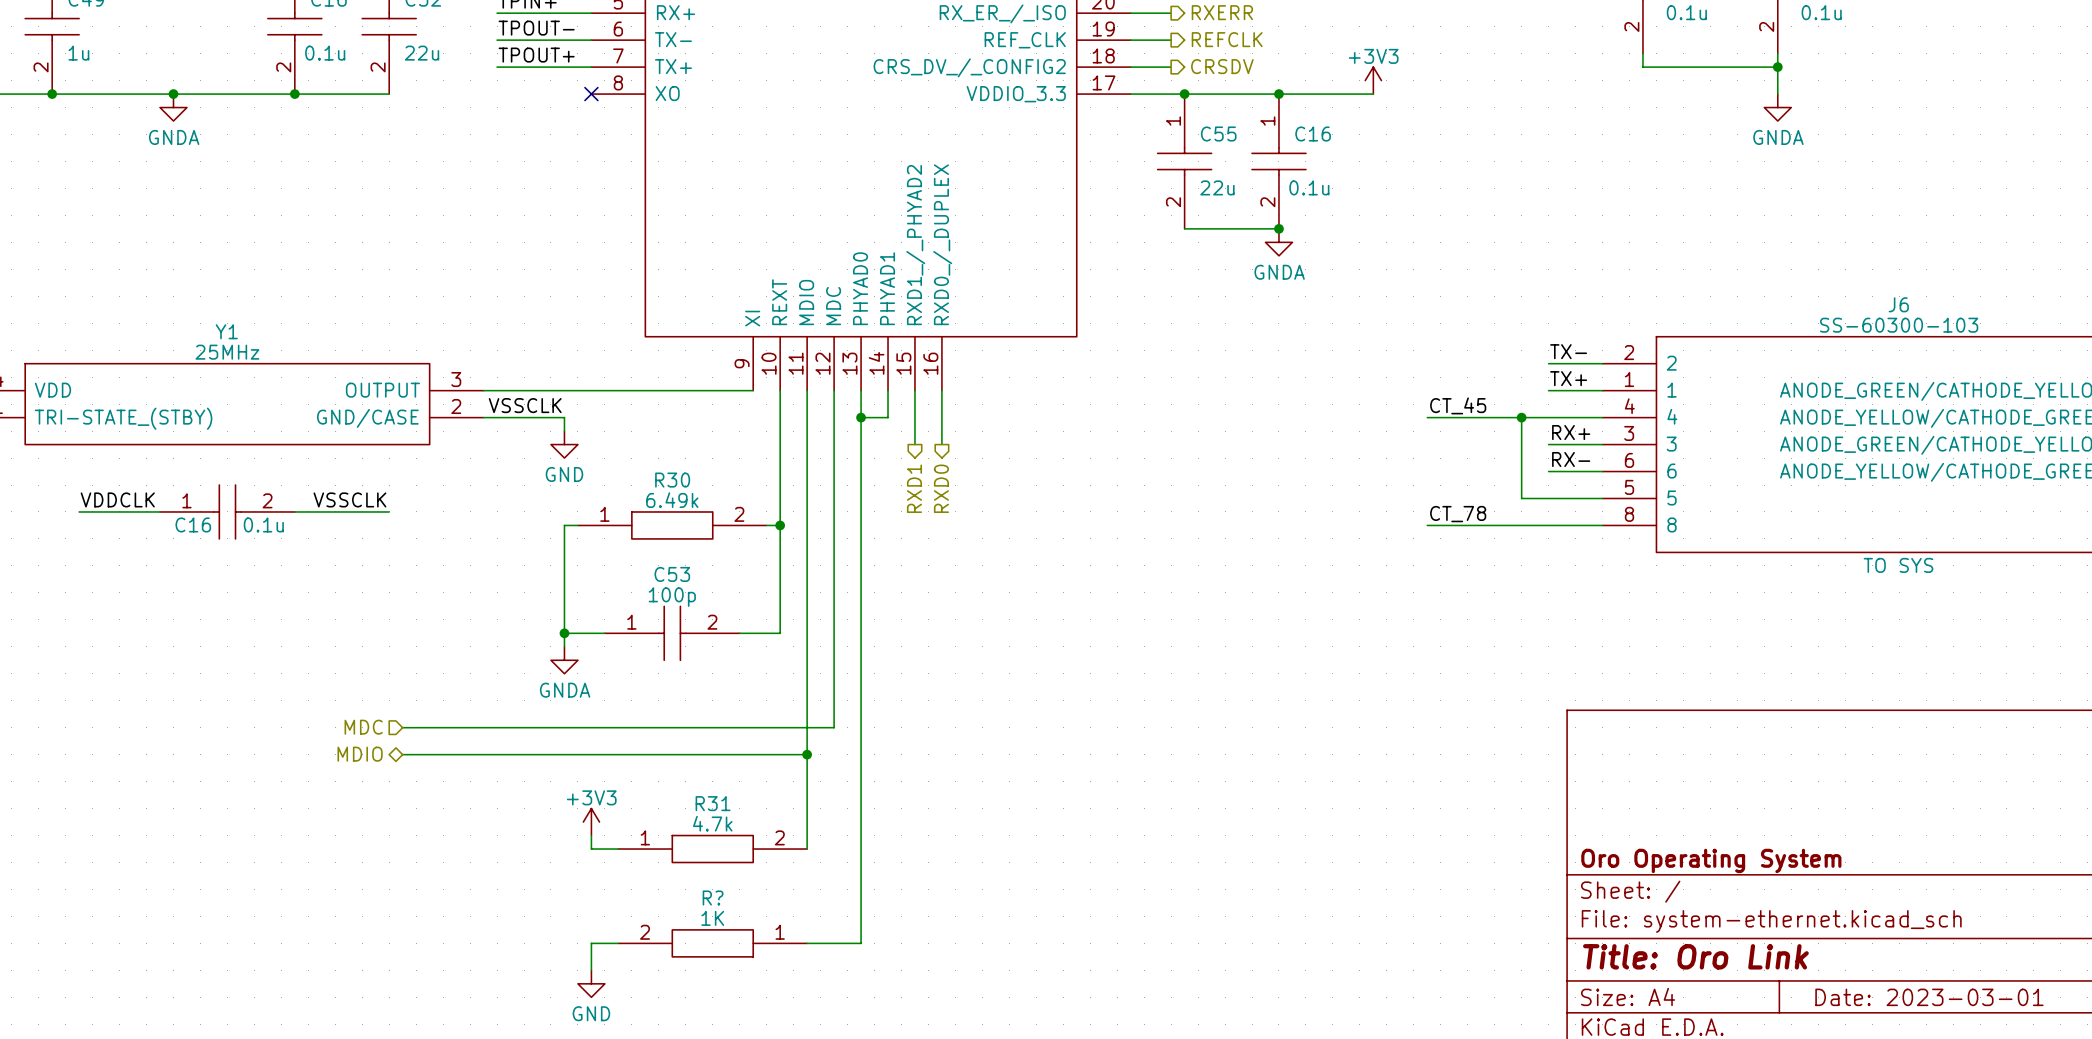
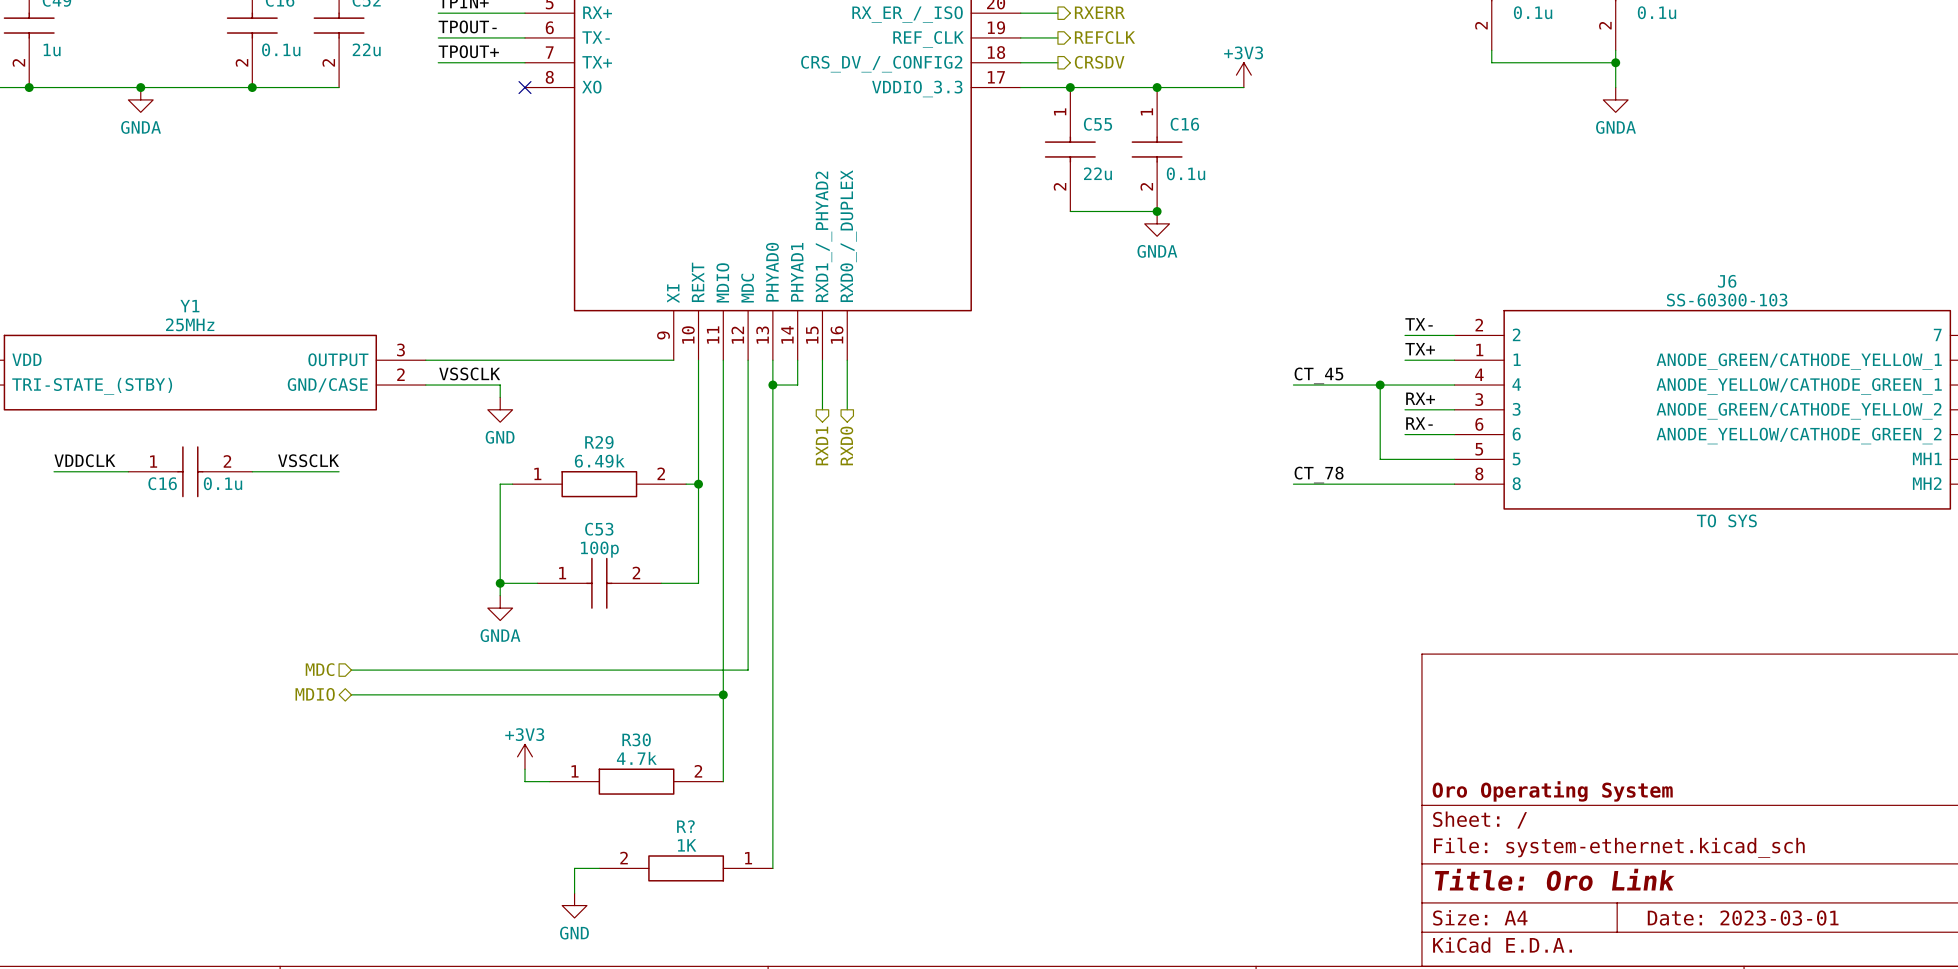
R30 name: R30 (672, 480) -> R29 (599, 442)
R31 name: R31 (713, 803) -> R30 (636, 739)
wire: (618, 943) (591, 943) (591, 970) -> (599, 868) (574, 868) (574, 893)
R? position: (712, 943) -> (686, 868)
power symbol position: GND (591, 983) -> GND (574, 905)

